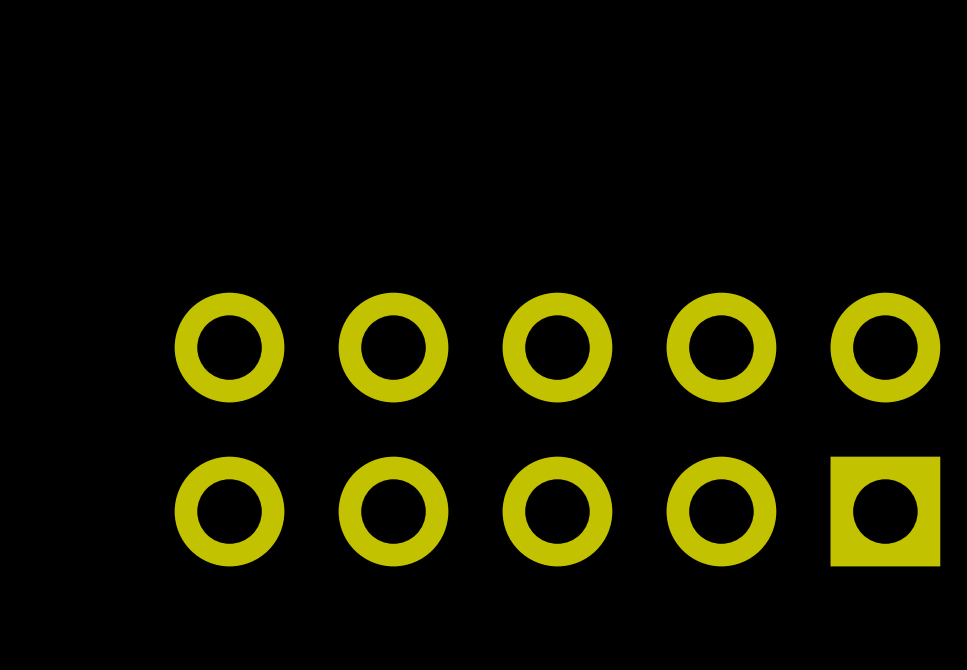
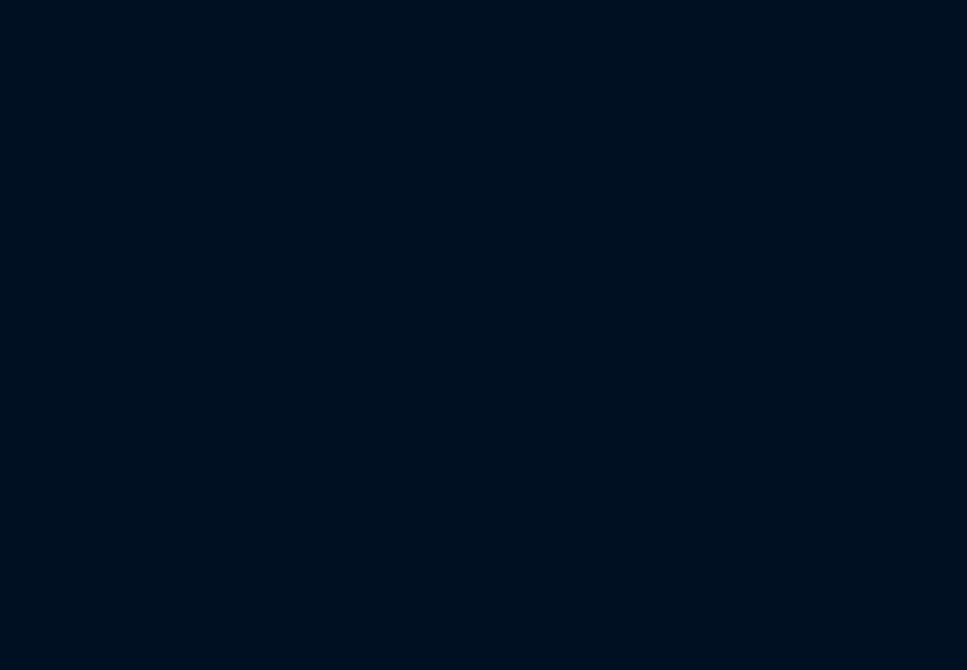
part: (557, 429) -> none

